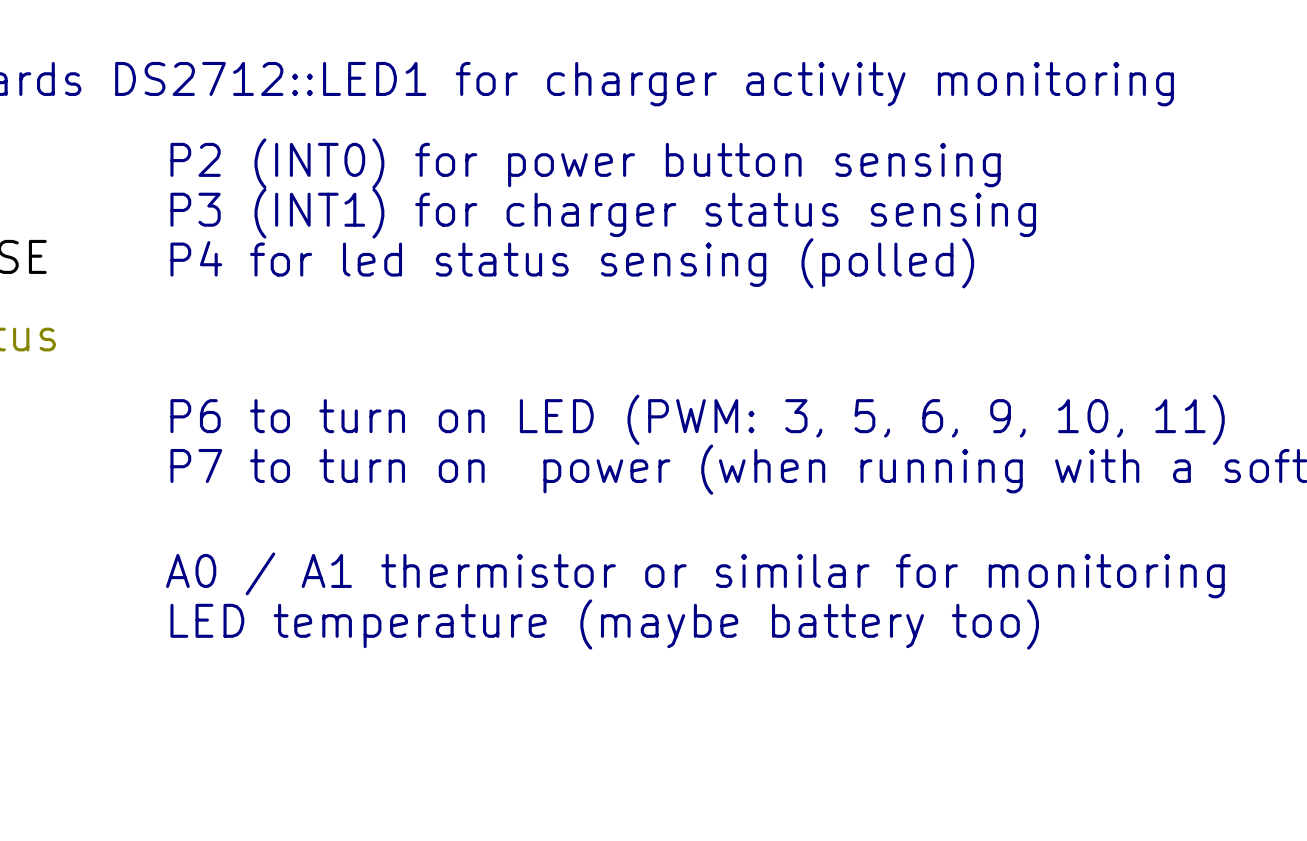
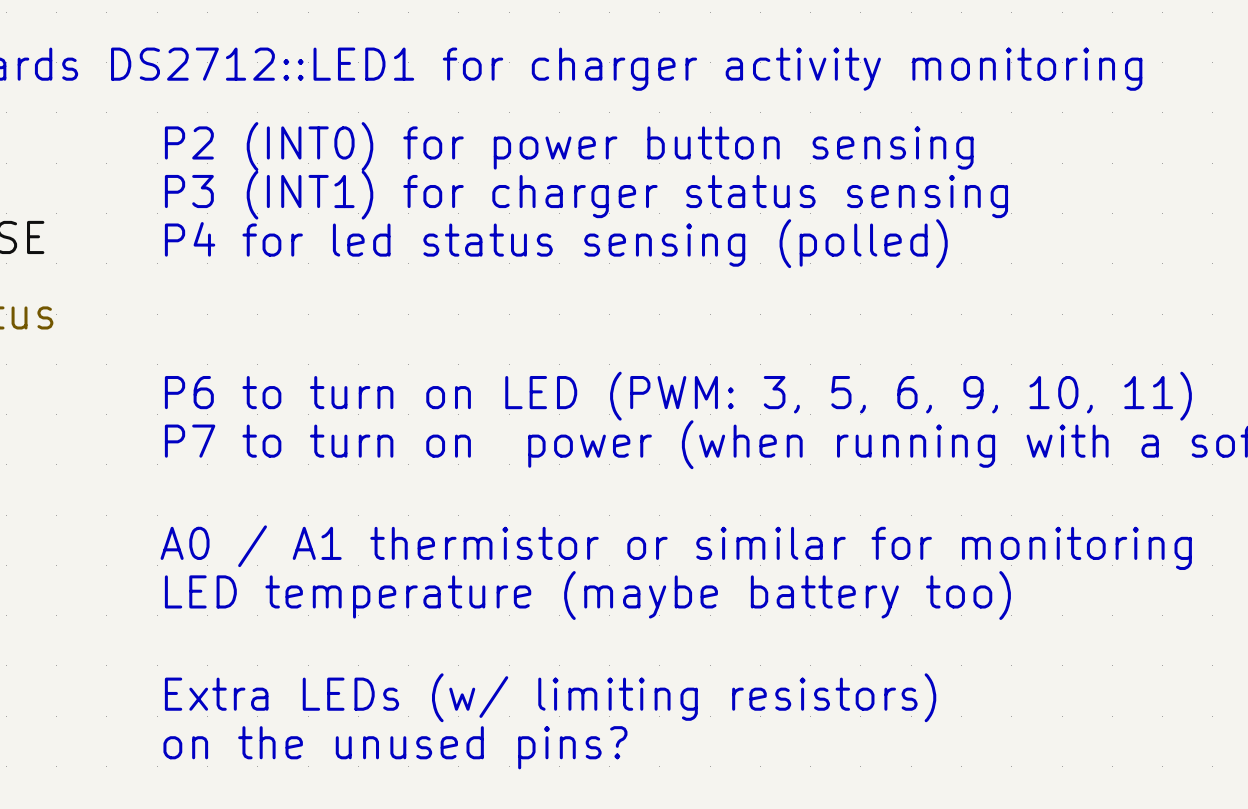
text: none -> Extra LEDs (w/ limiting resistors) (550, 697)
text: none -> on the unused pins? (395, 747)

